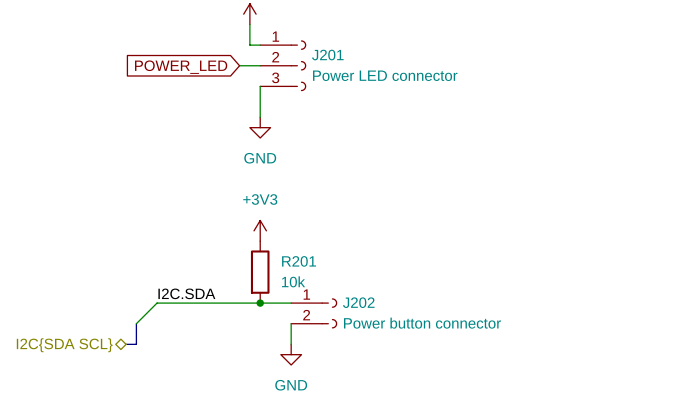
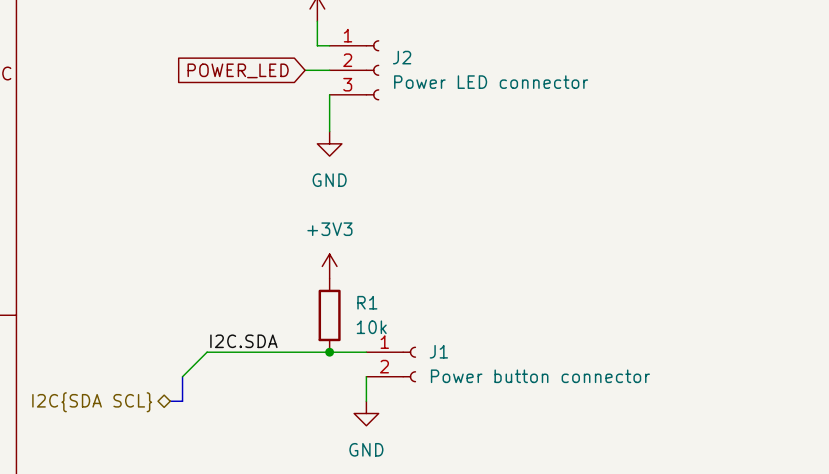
J2: none -> Power LED connector (354, 70)
J201: Power LED connector (283, 65) -> none
R201 name: R201 (299, 261) -> R1 (367, 302)
J1: none -> Power button connector (391, 364)
J202: Power button connector (314, 313) -> none

